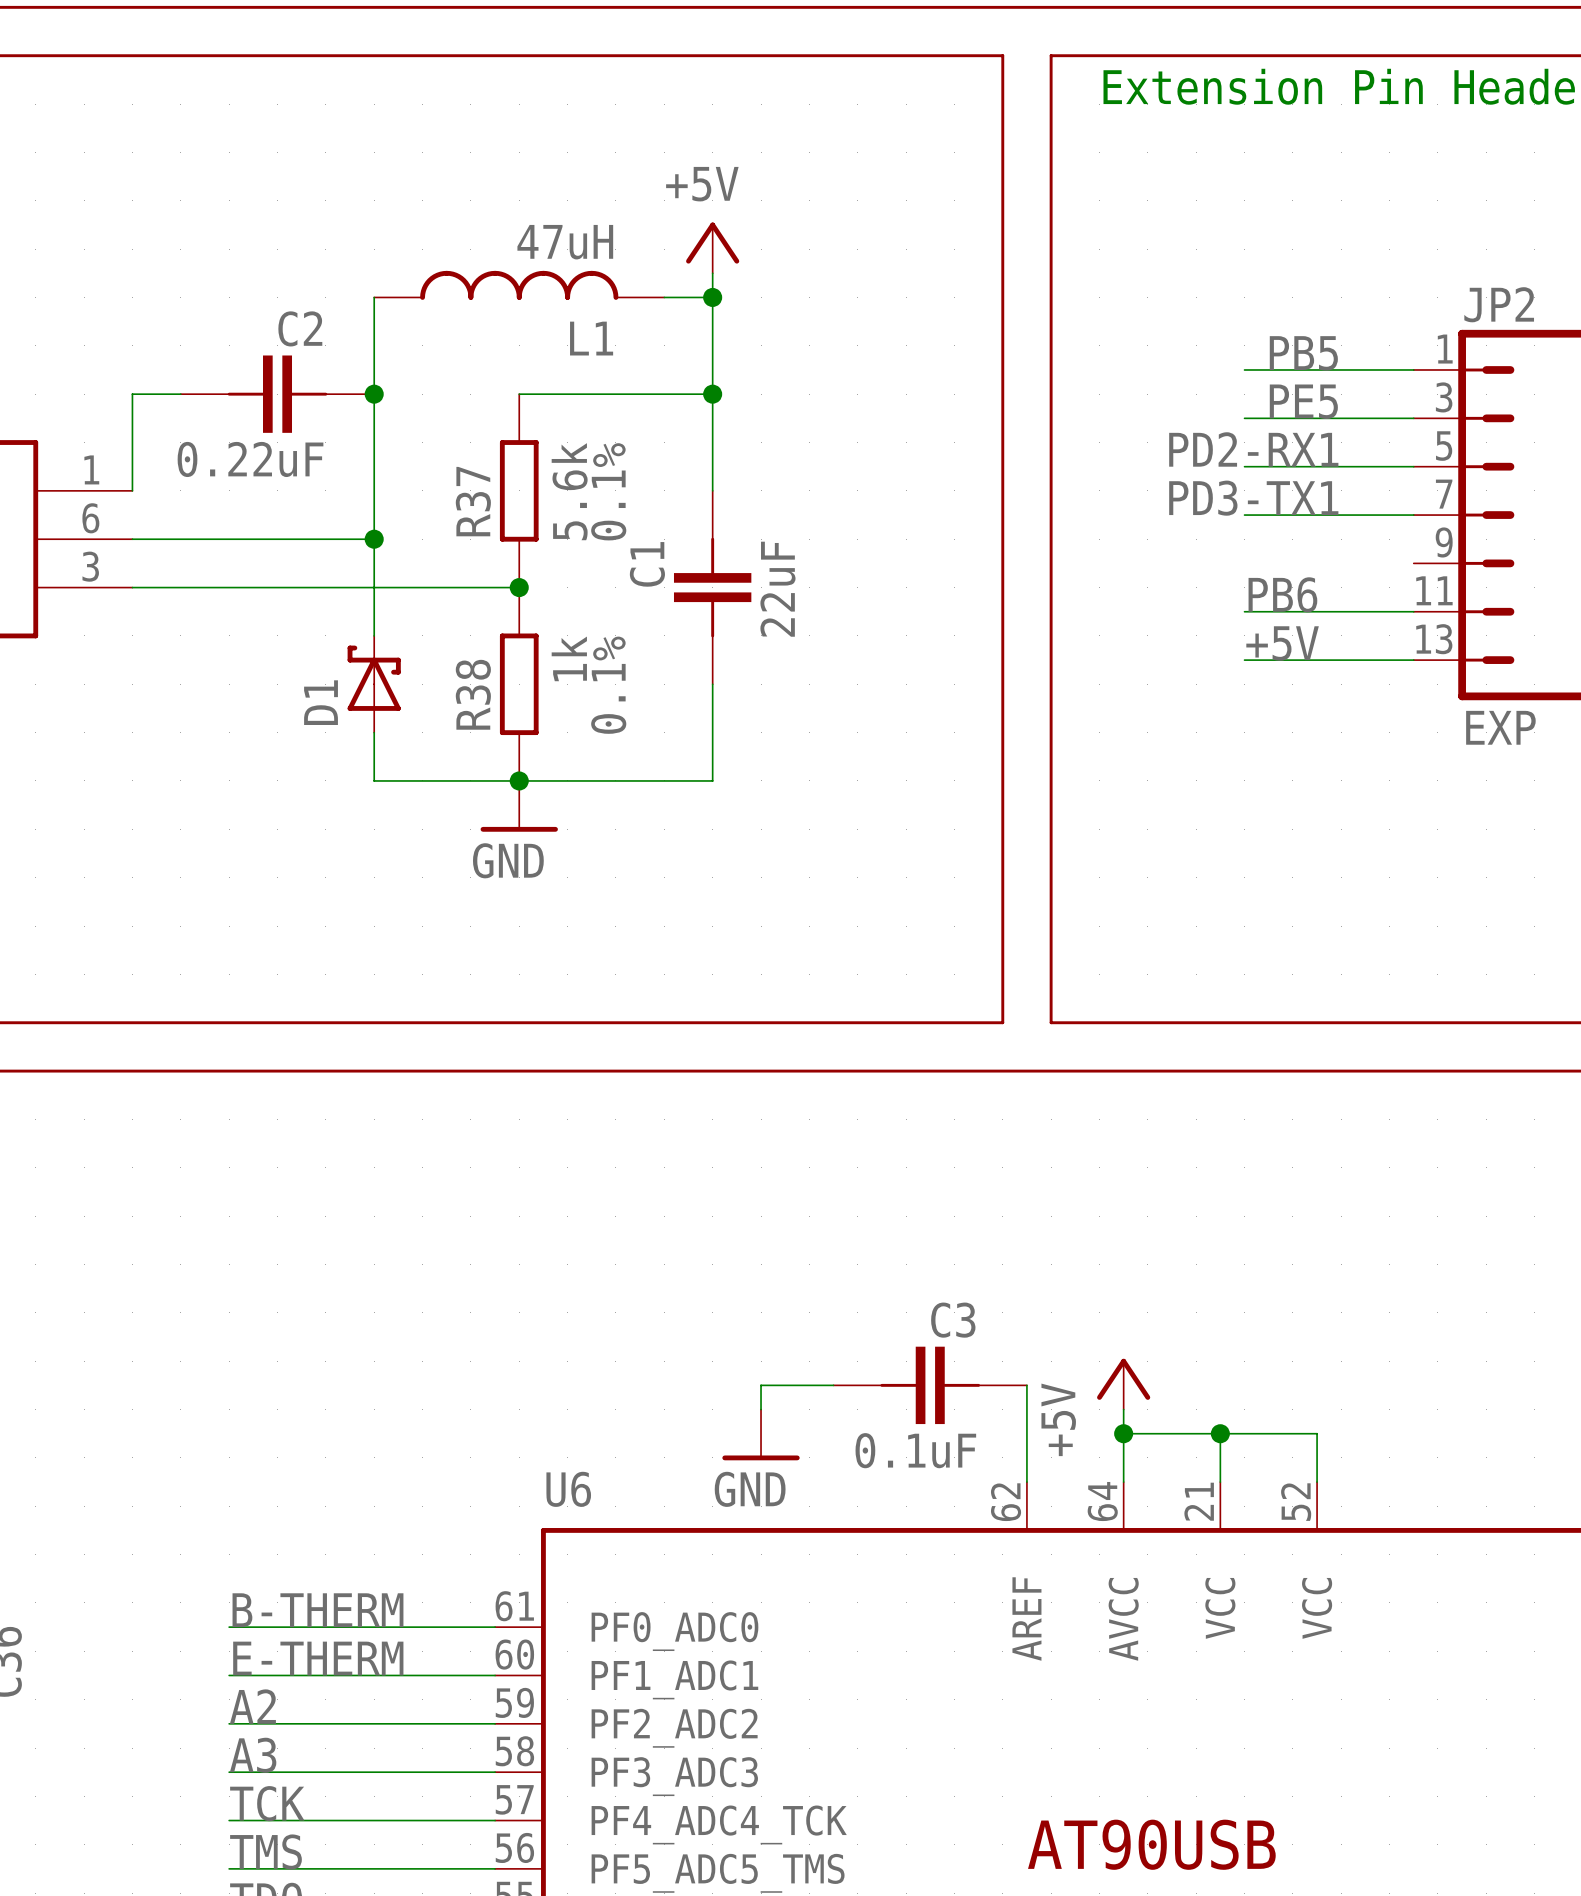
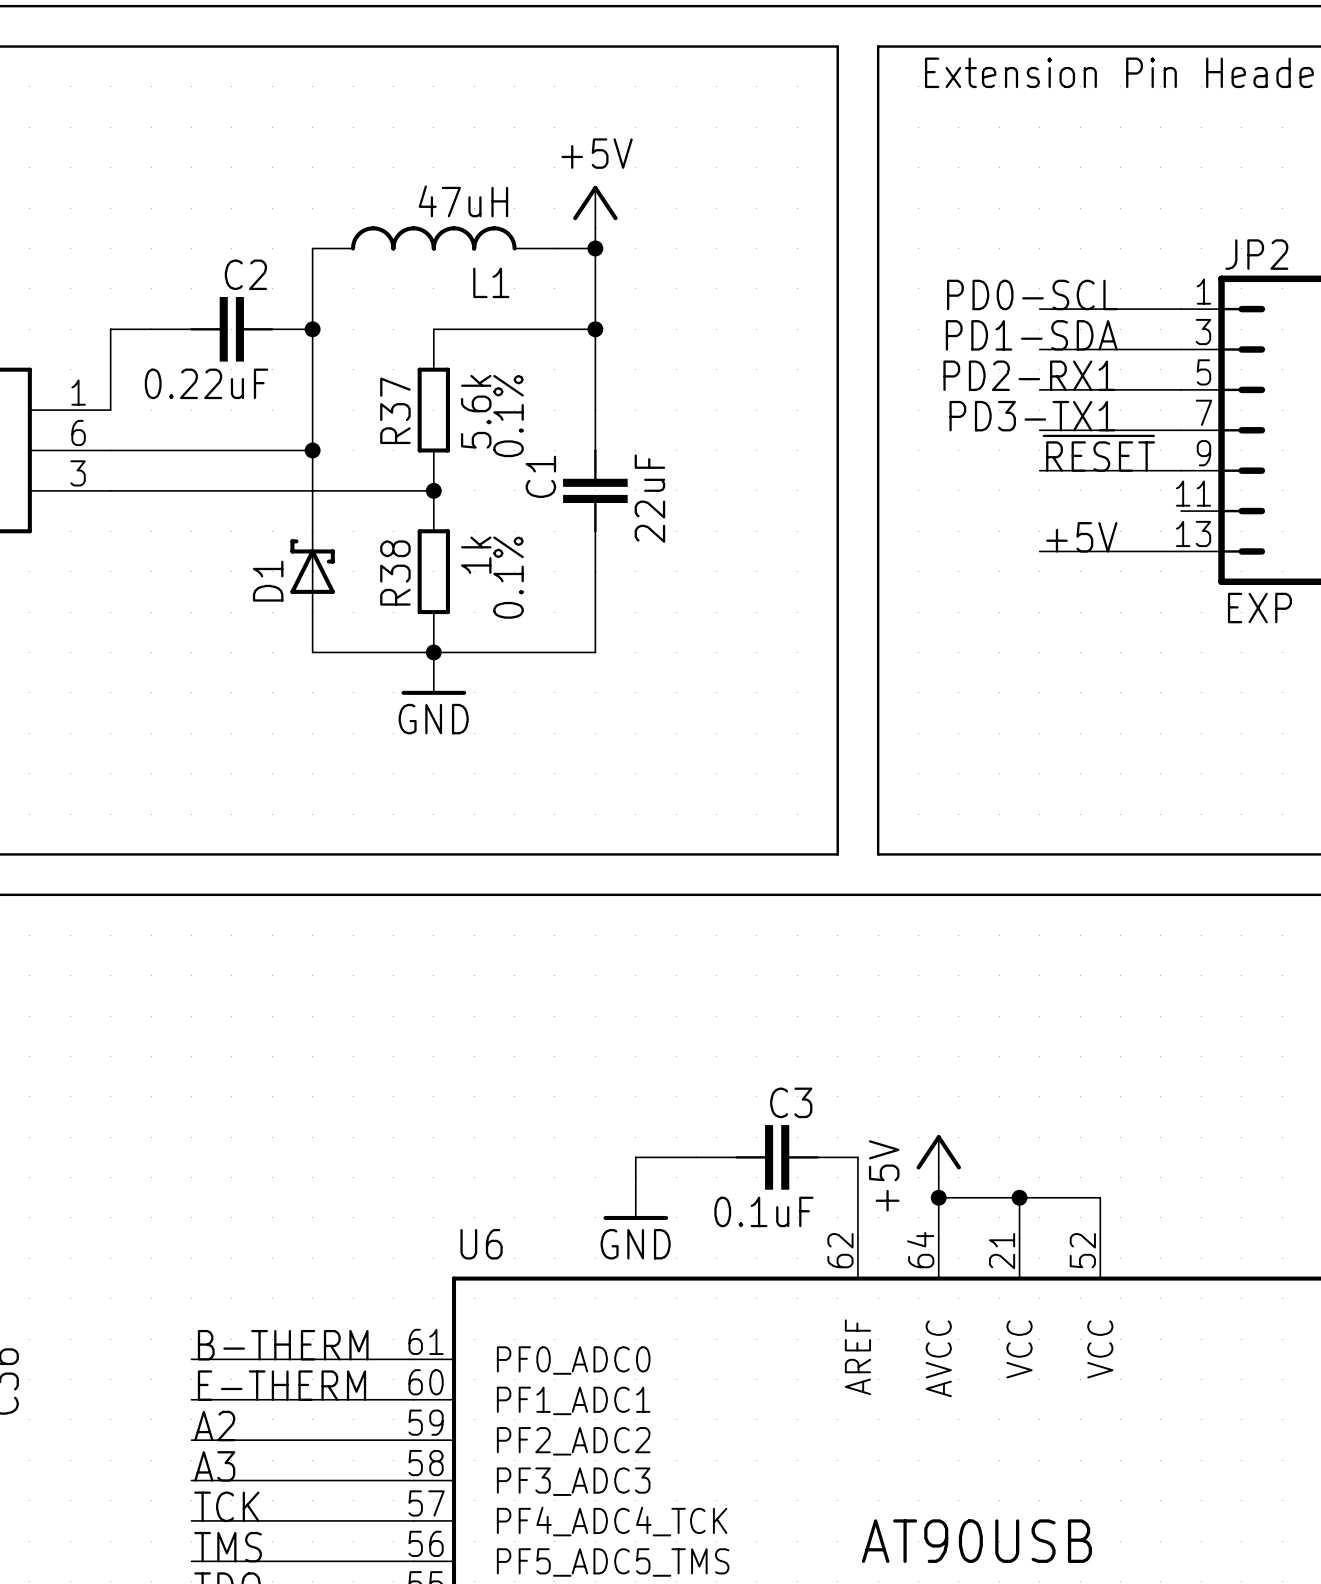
label: PB5 (1303, 353) -> PD0-SCL (1032, 294)
label: PE5 (1303, 401) -> PD1-SDA (1031, 335)
label: none -> ~{RESET} (1098, 453)
label: PB6 (1282, 594) -> none
wire: (1244, 611) (1413, 611) -> (1039, 470) (1181, 470)

